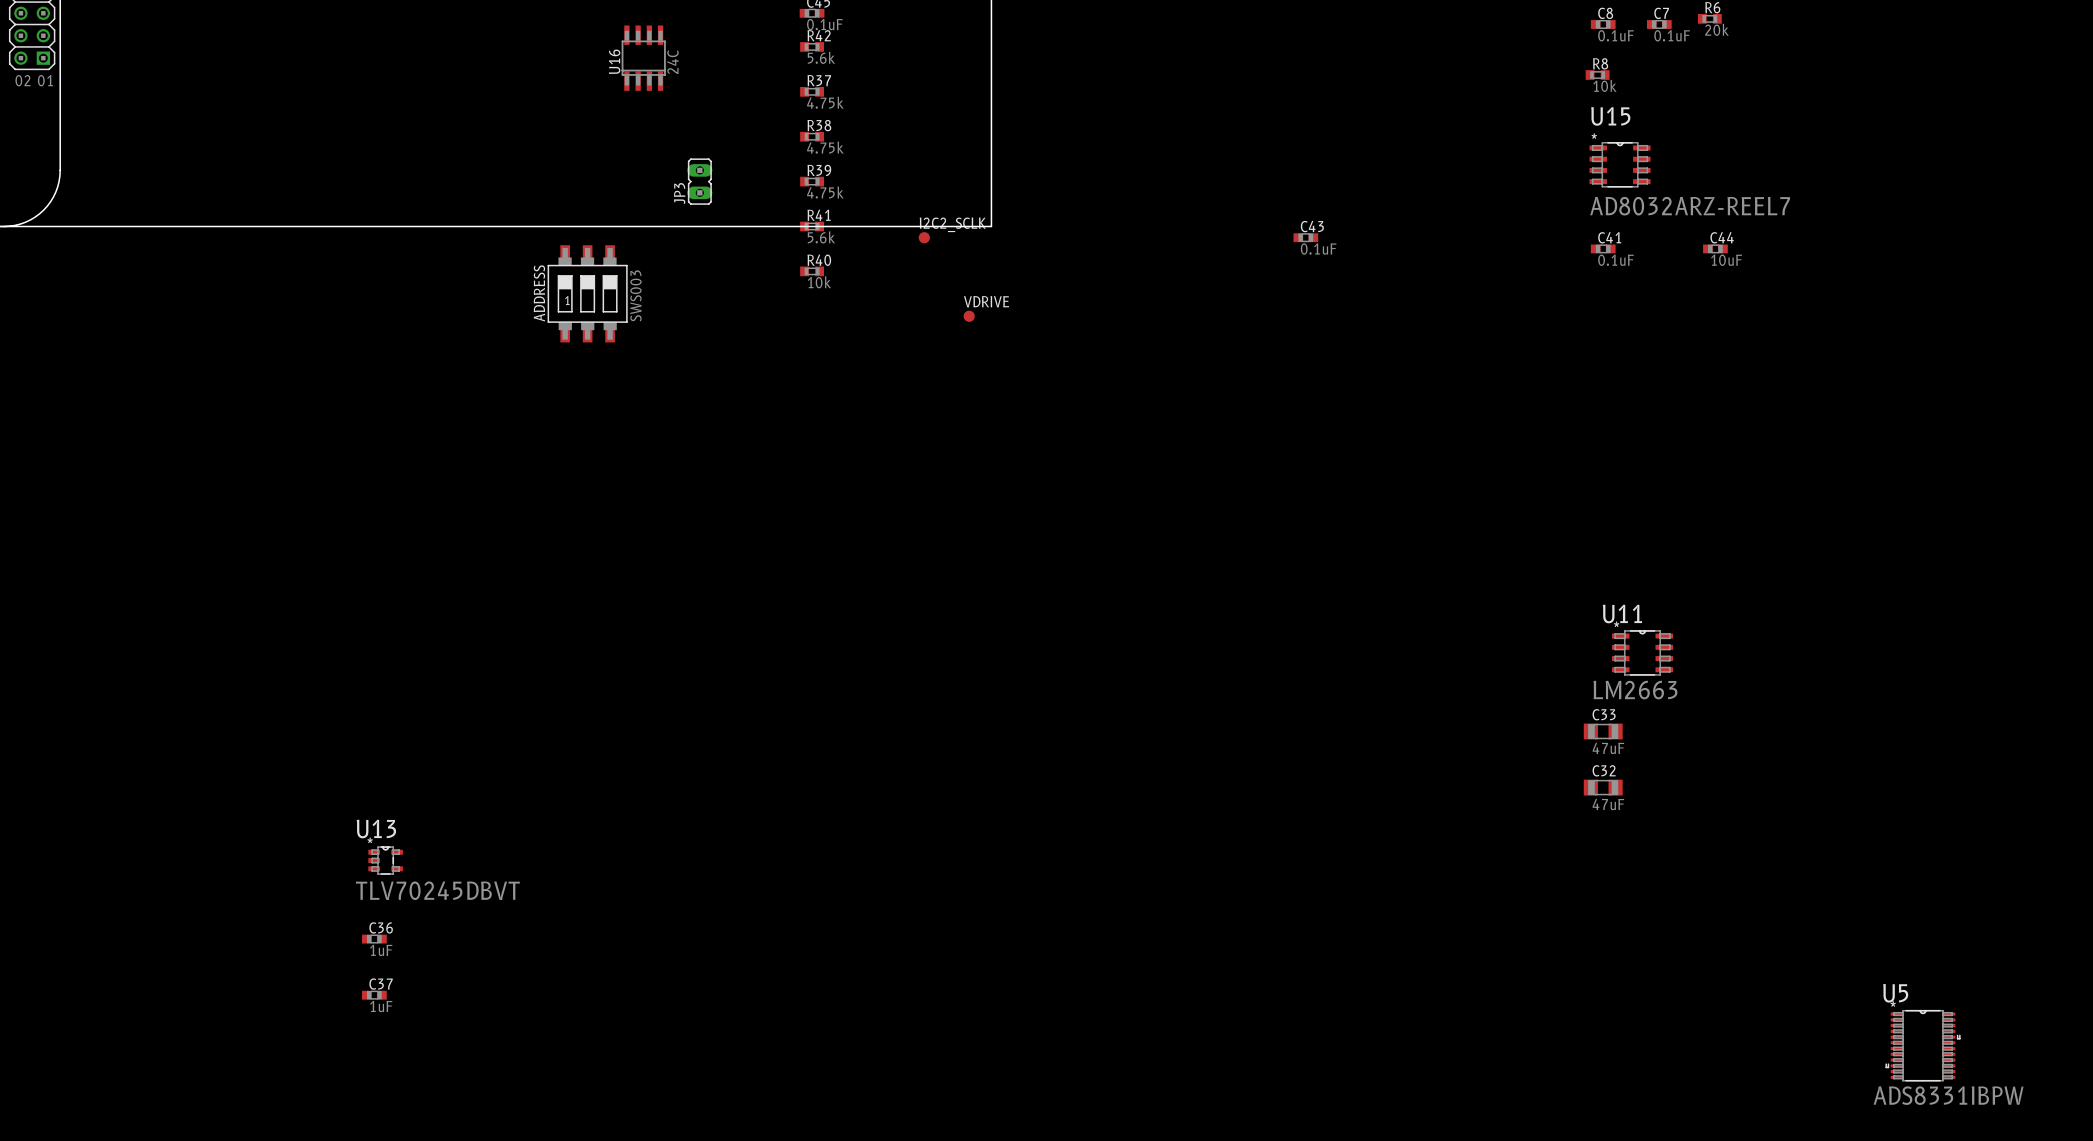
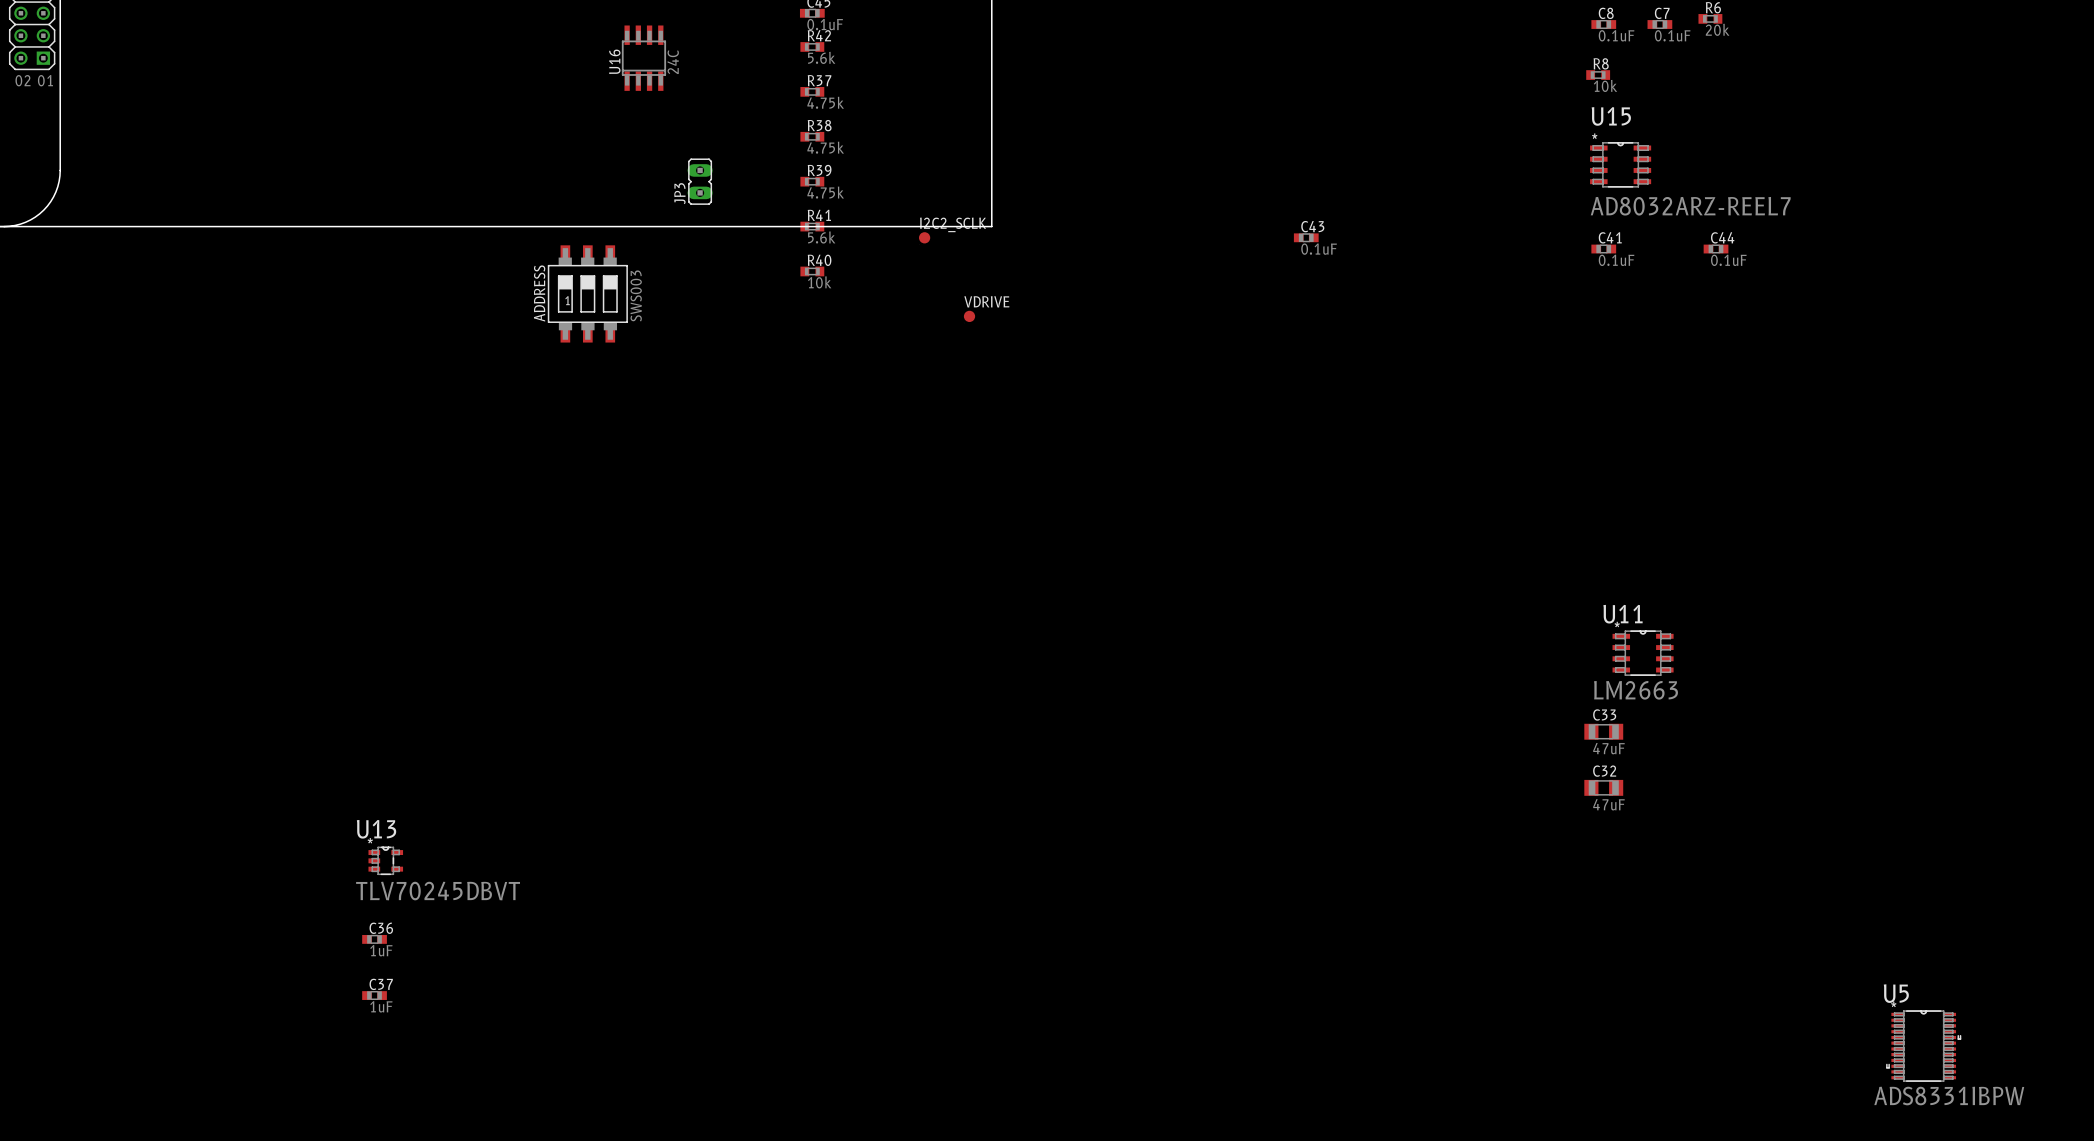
C44 value: 10uF (1726, 260) -> 0.1uF (1728, 260)

